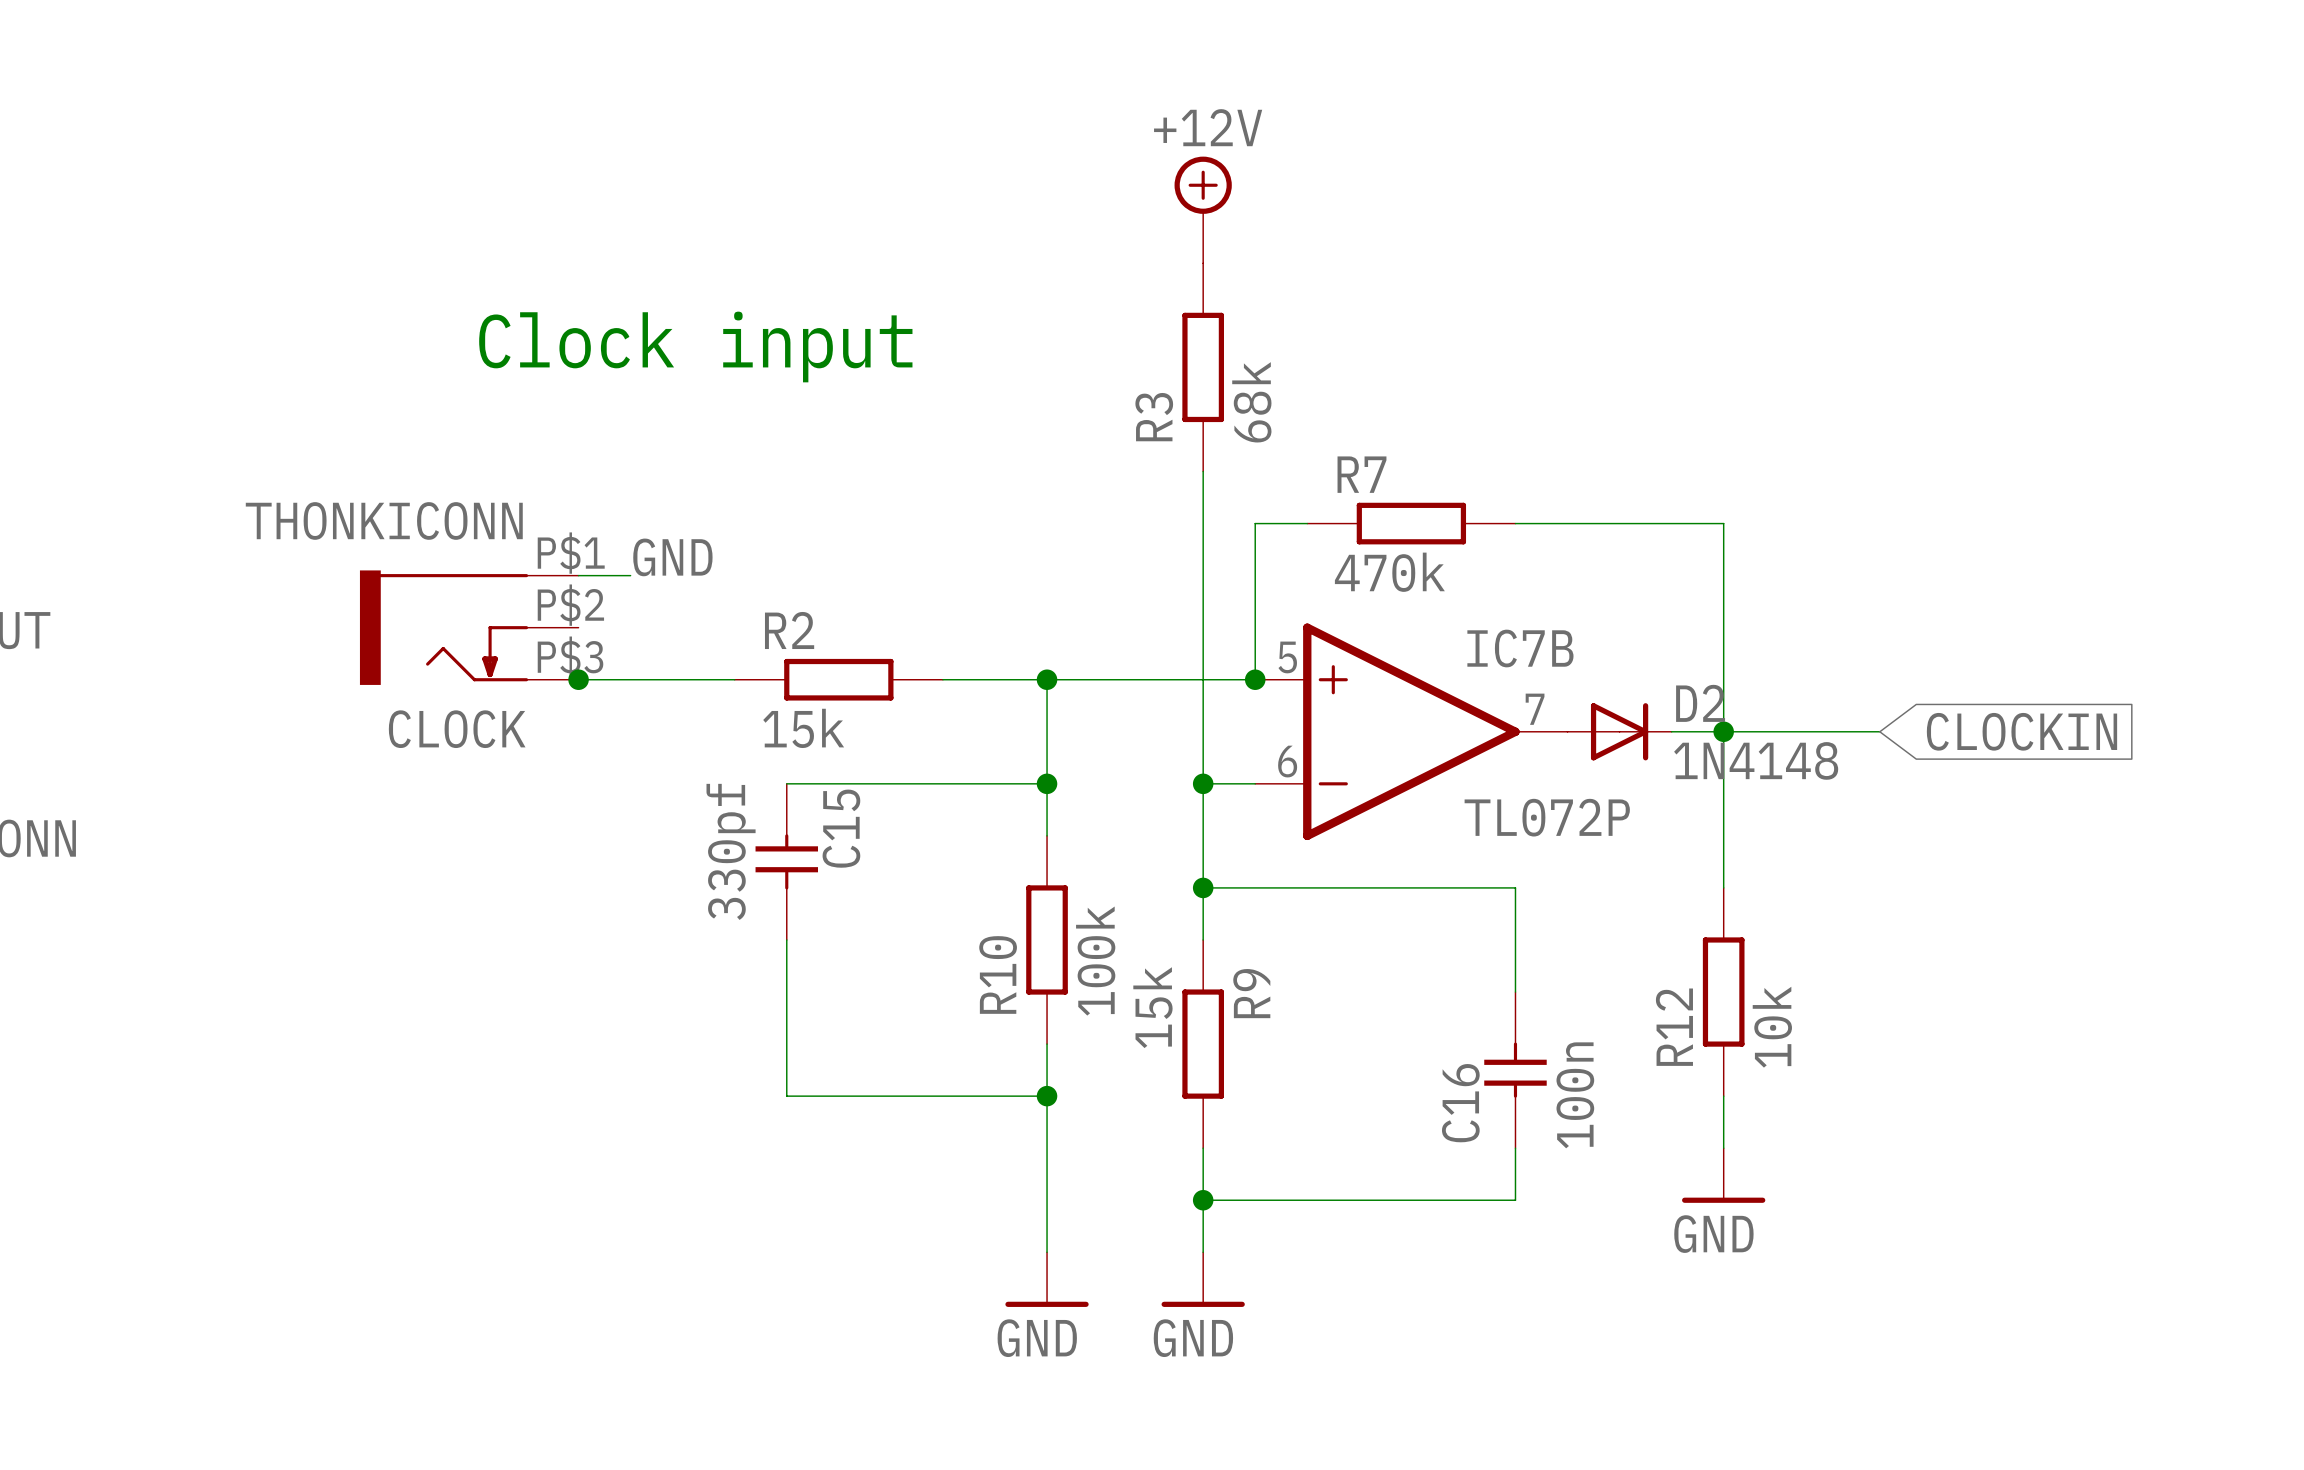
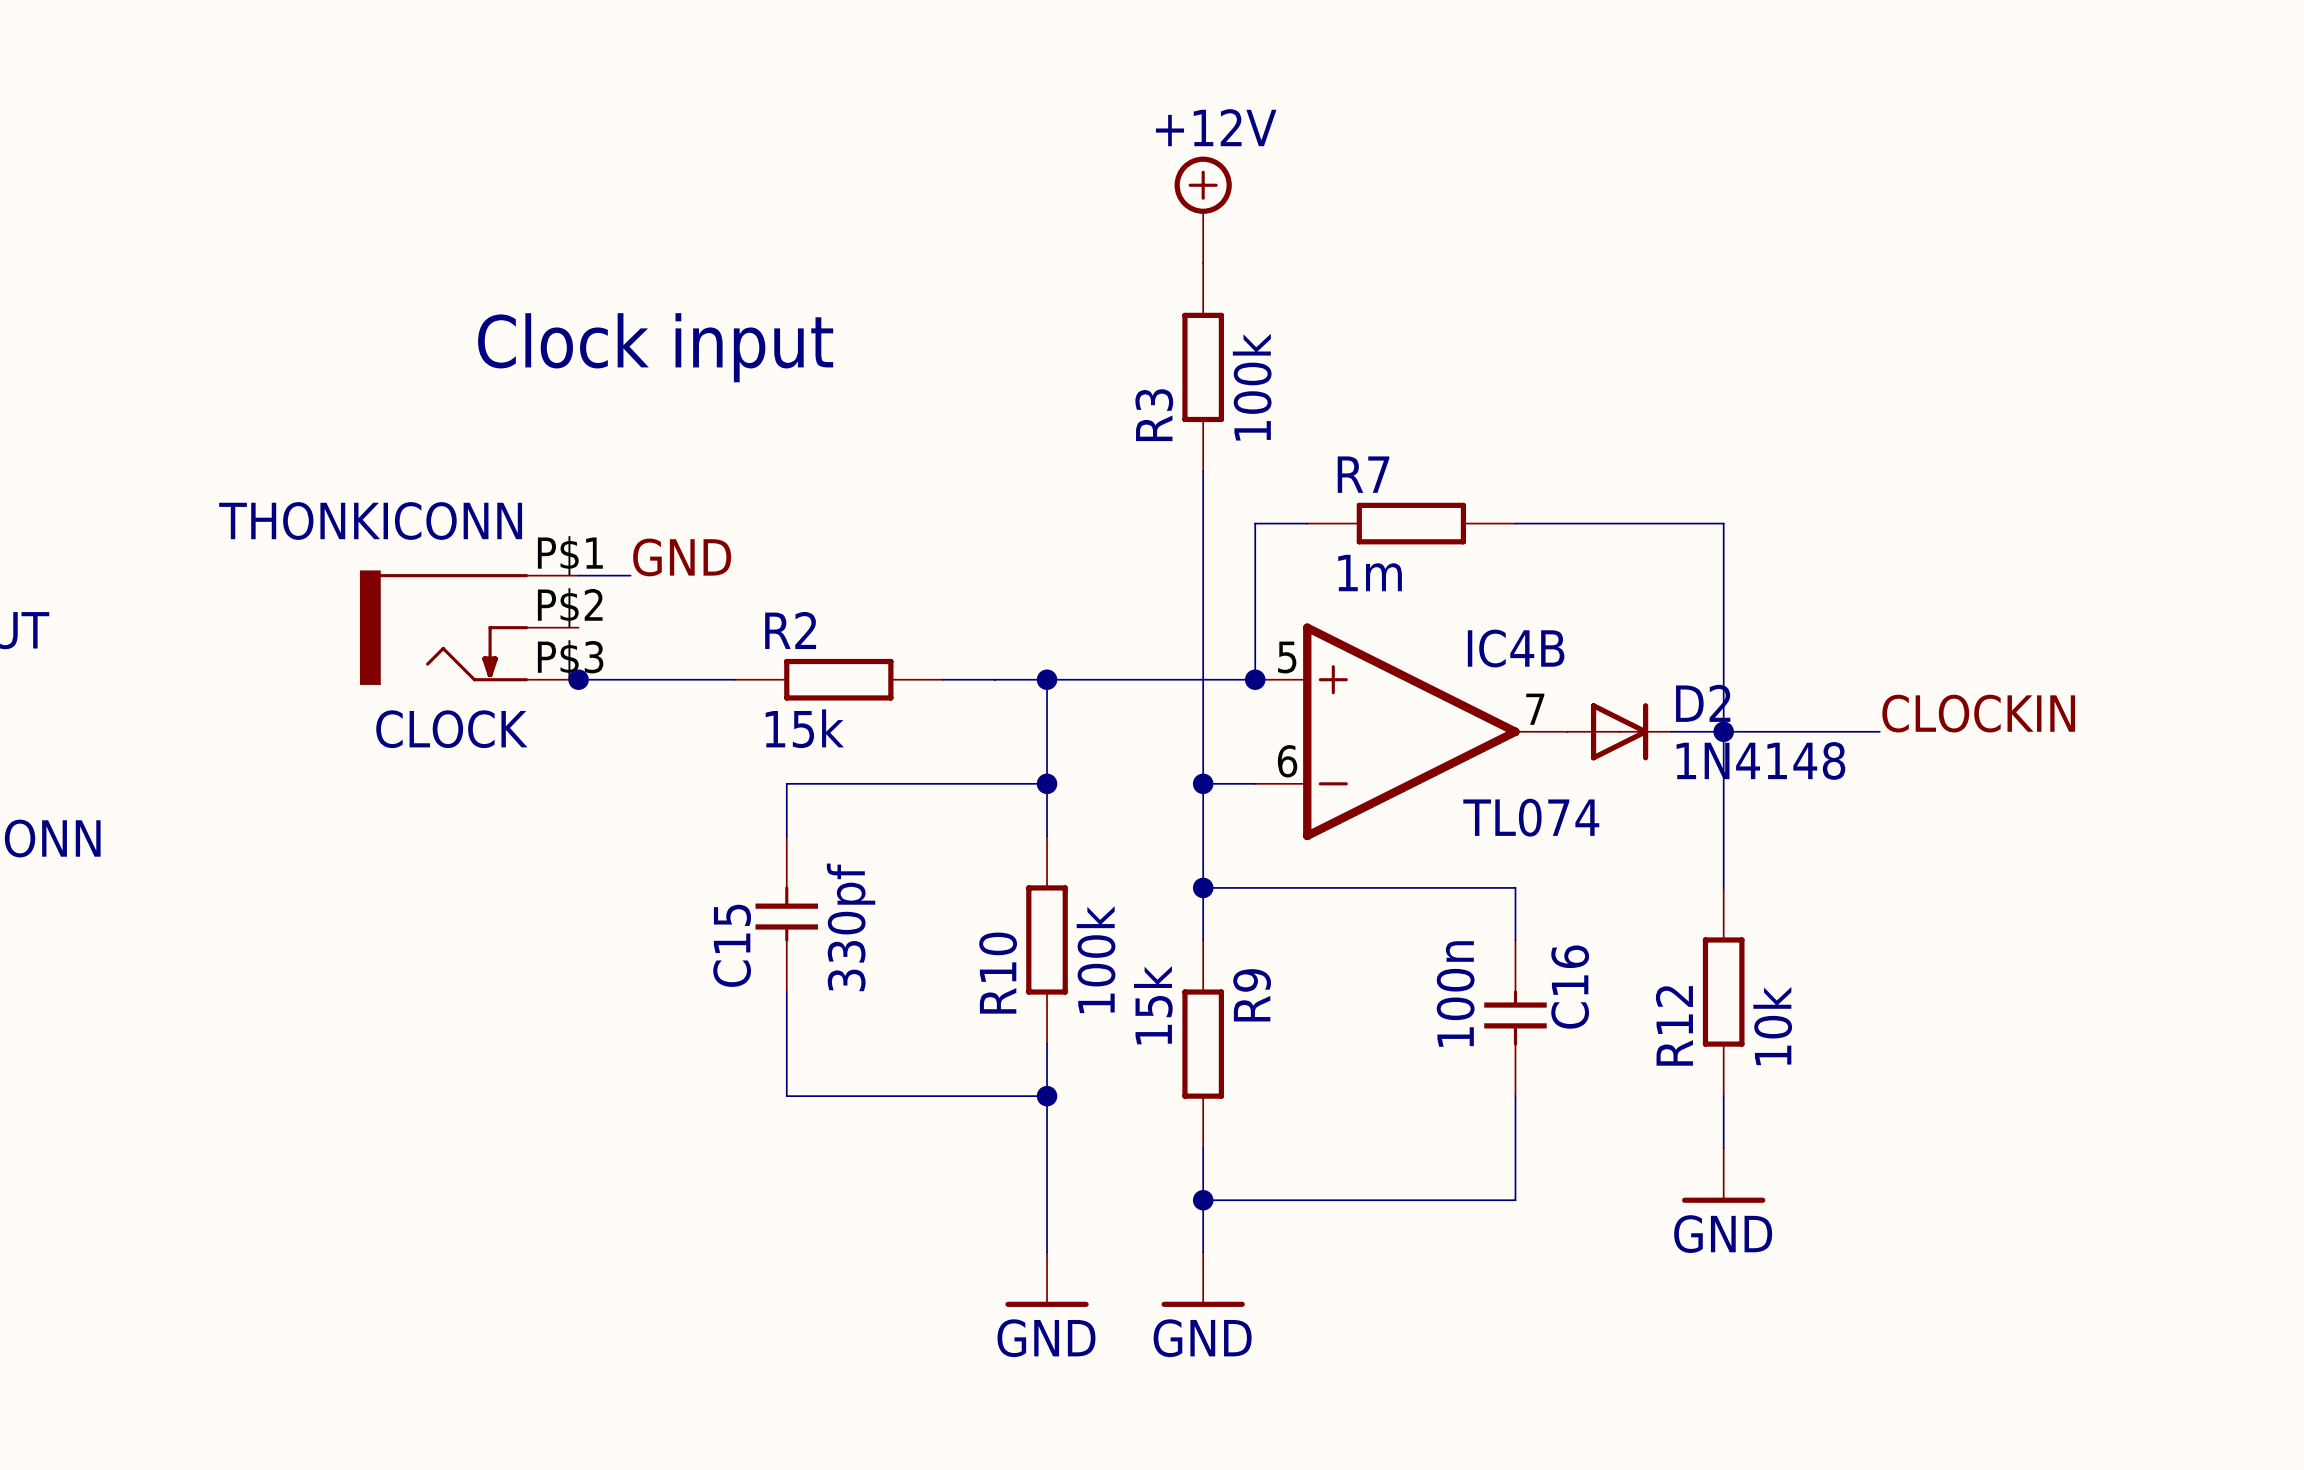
R3 value: 68k (1251, 402) -> 100k (1252, 387)
R7 value: 470k (1389, 572) -> 1m (1370, 573)
IC7B name: IC7B (1520, 648) -> IC4B (1516, 648)
label: none -> CLOCKIN (1978, 713)
global label: CLOCKIN (2021, 731) -> none
IC7B value: TL072P (1547, 817) -> TL074 (1531, 817)
C15 rotation: 0° (786, 861) -> 180° (786, 913)
C16 rotation: 0° (1515, 1070) -> 180° (1515, 1018)

